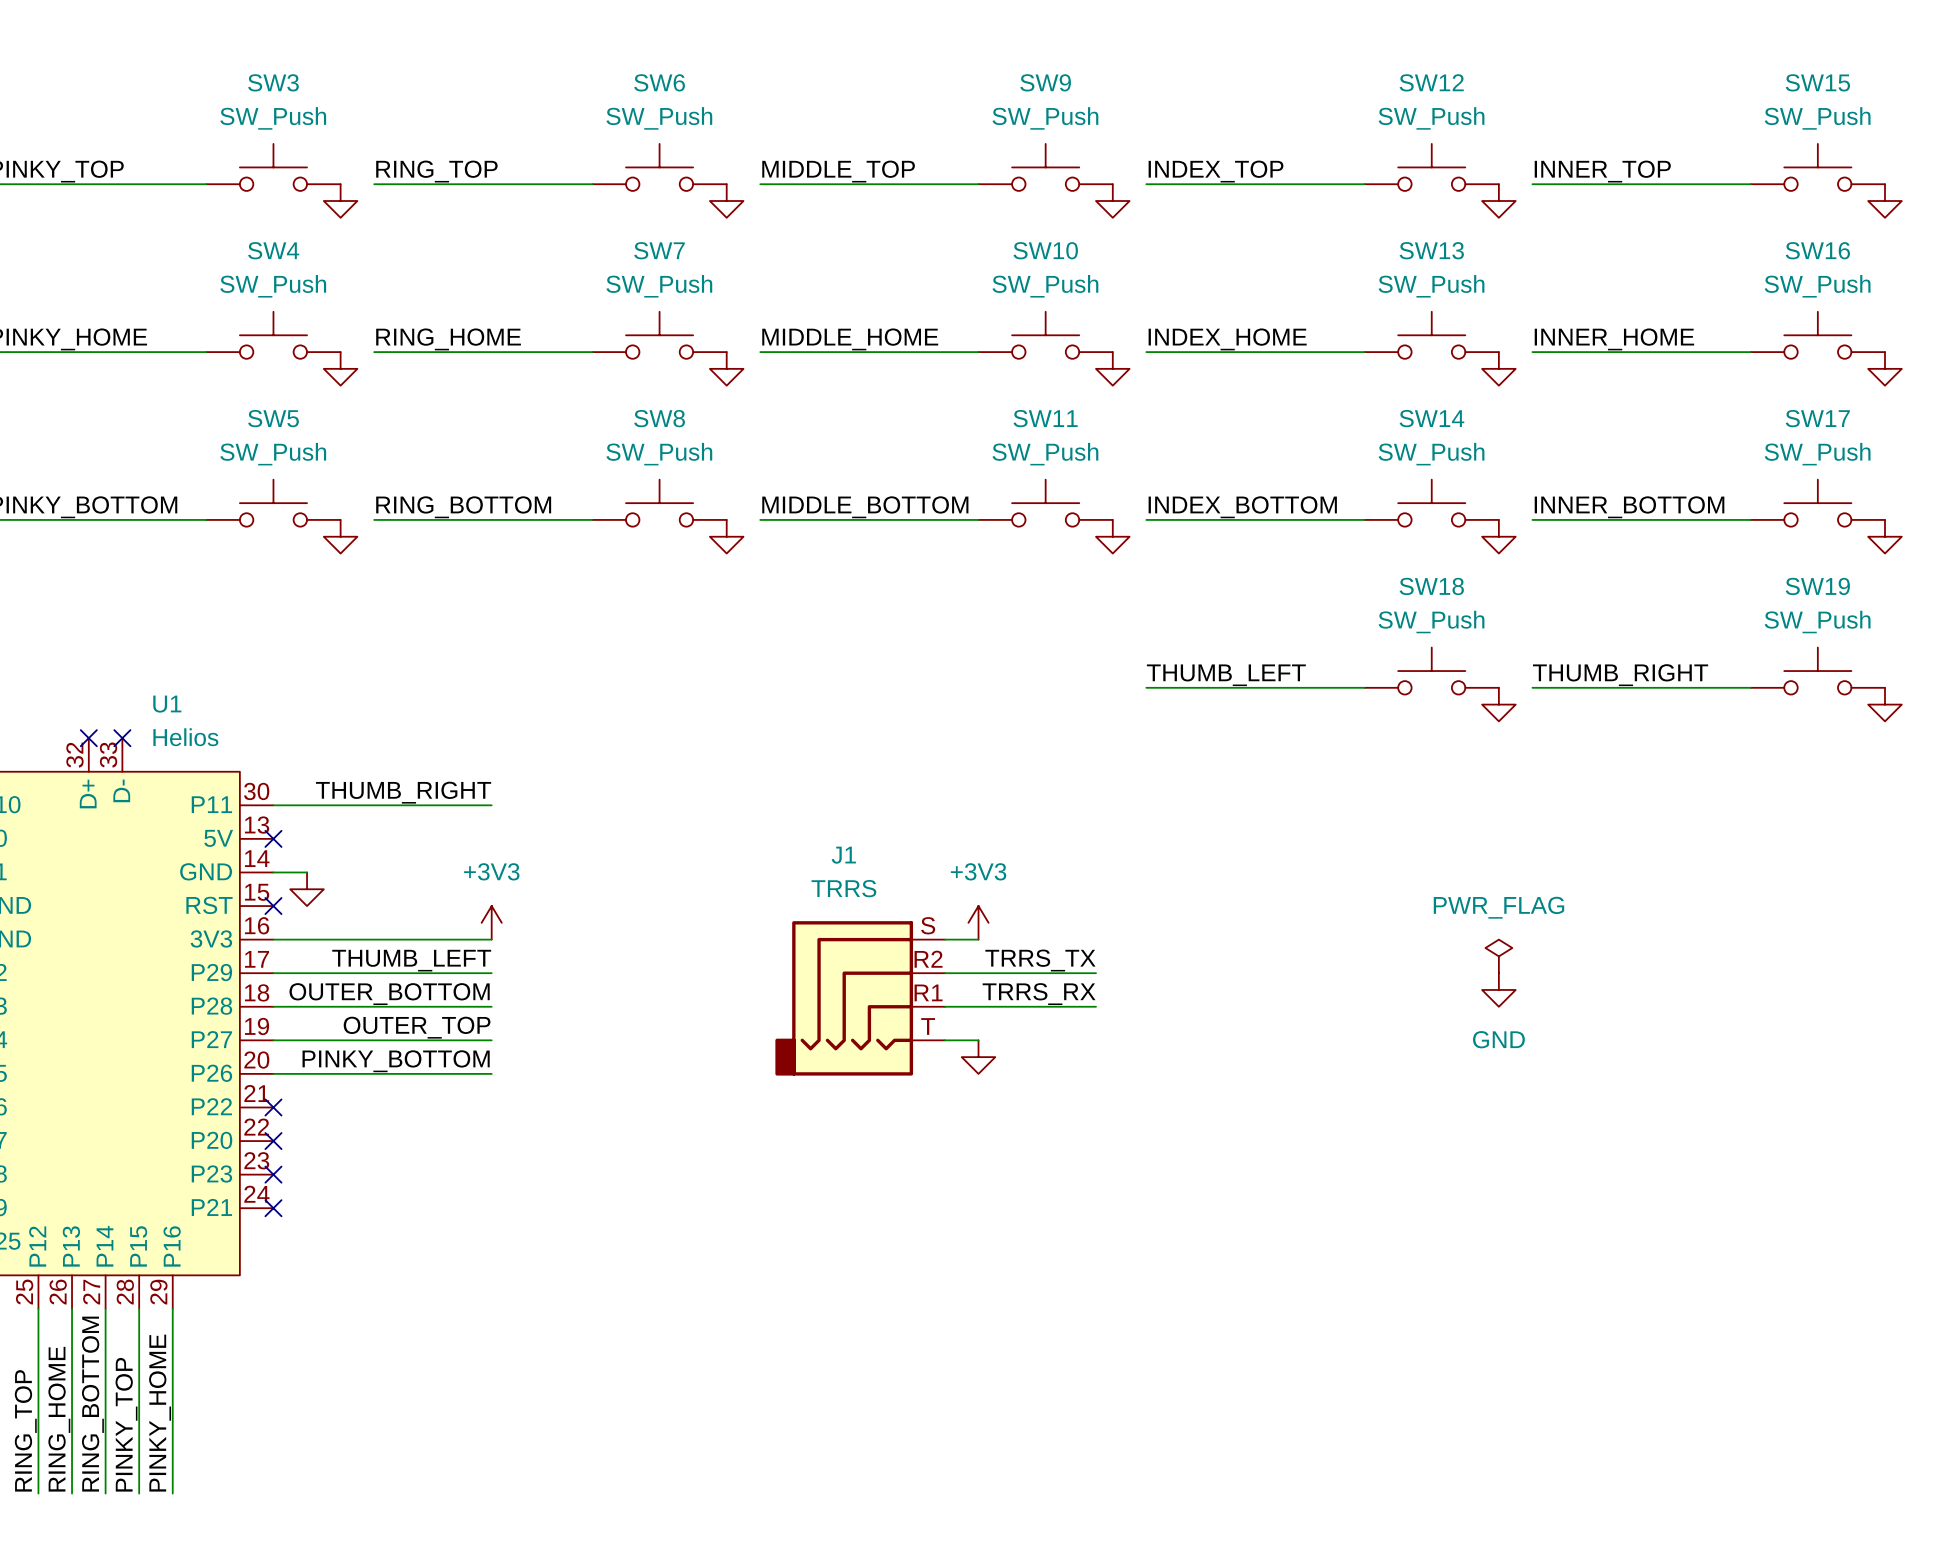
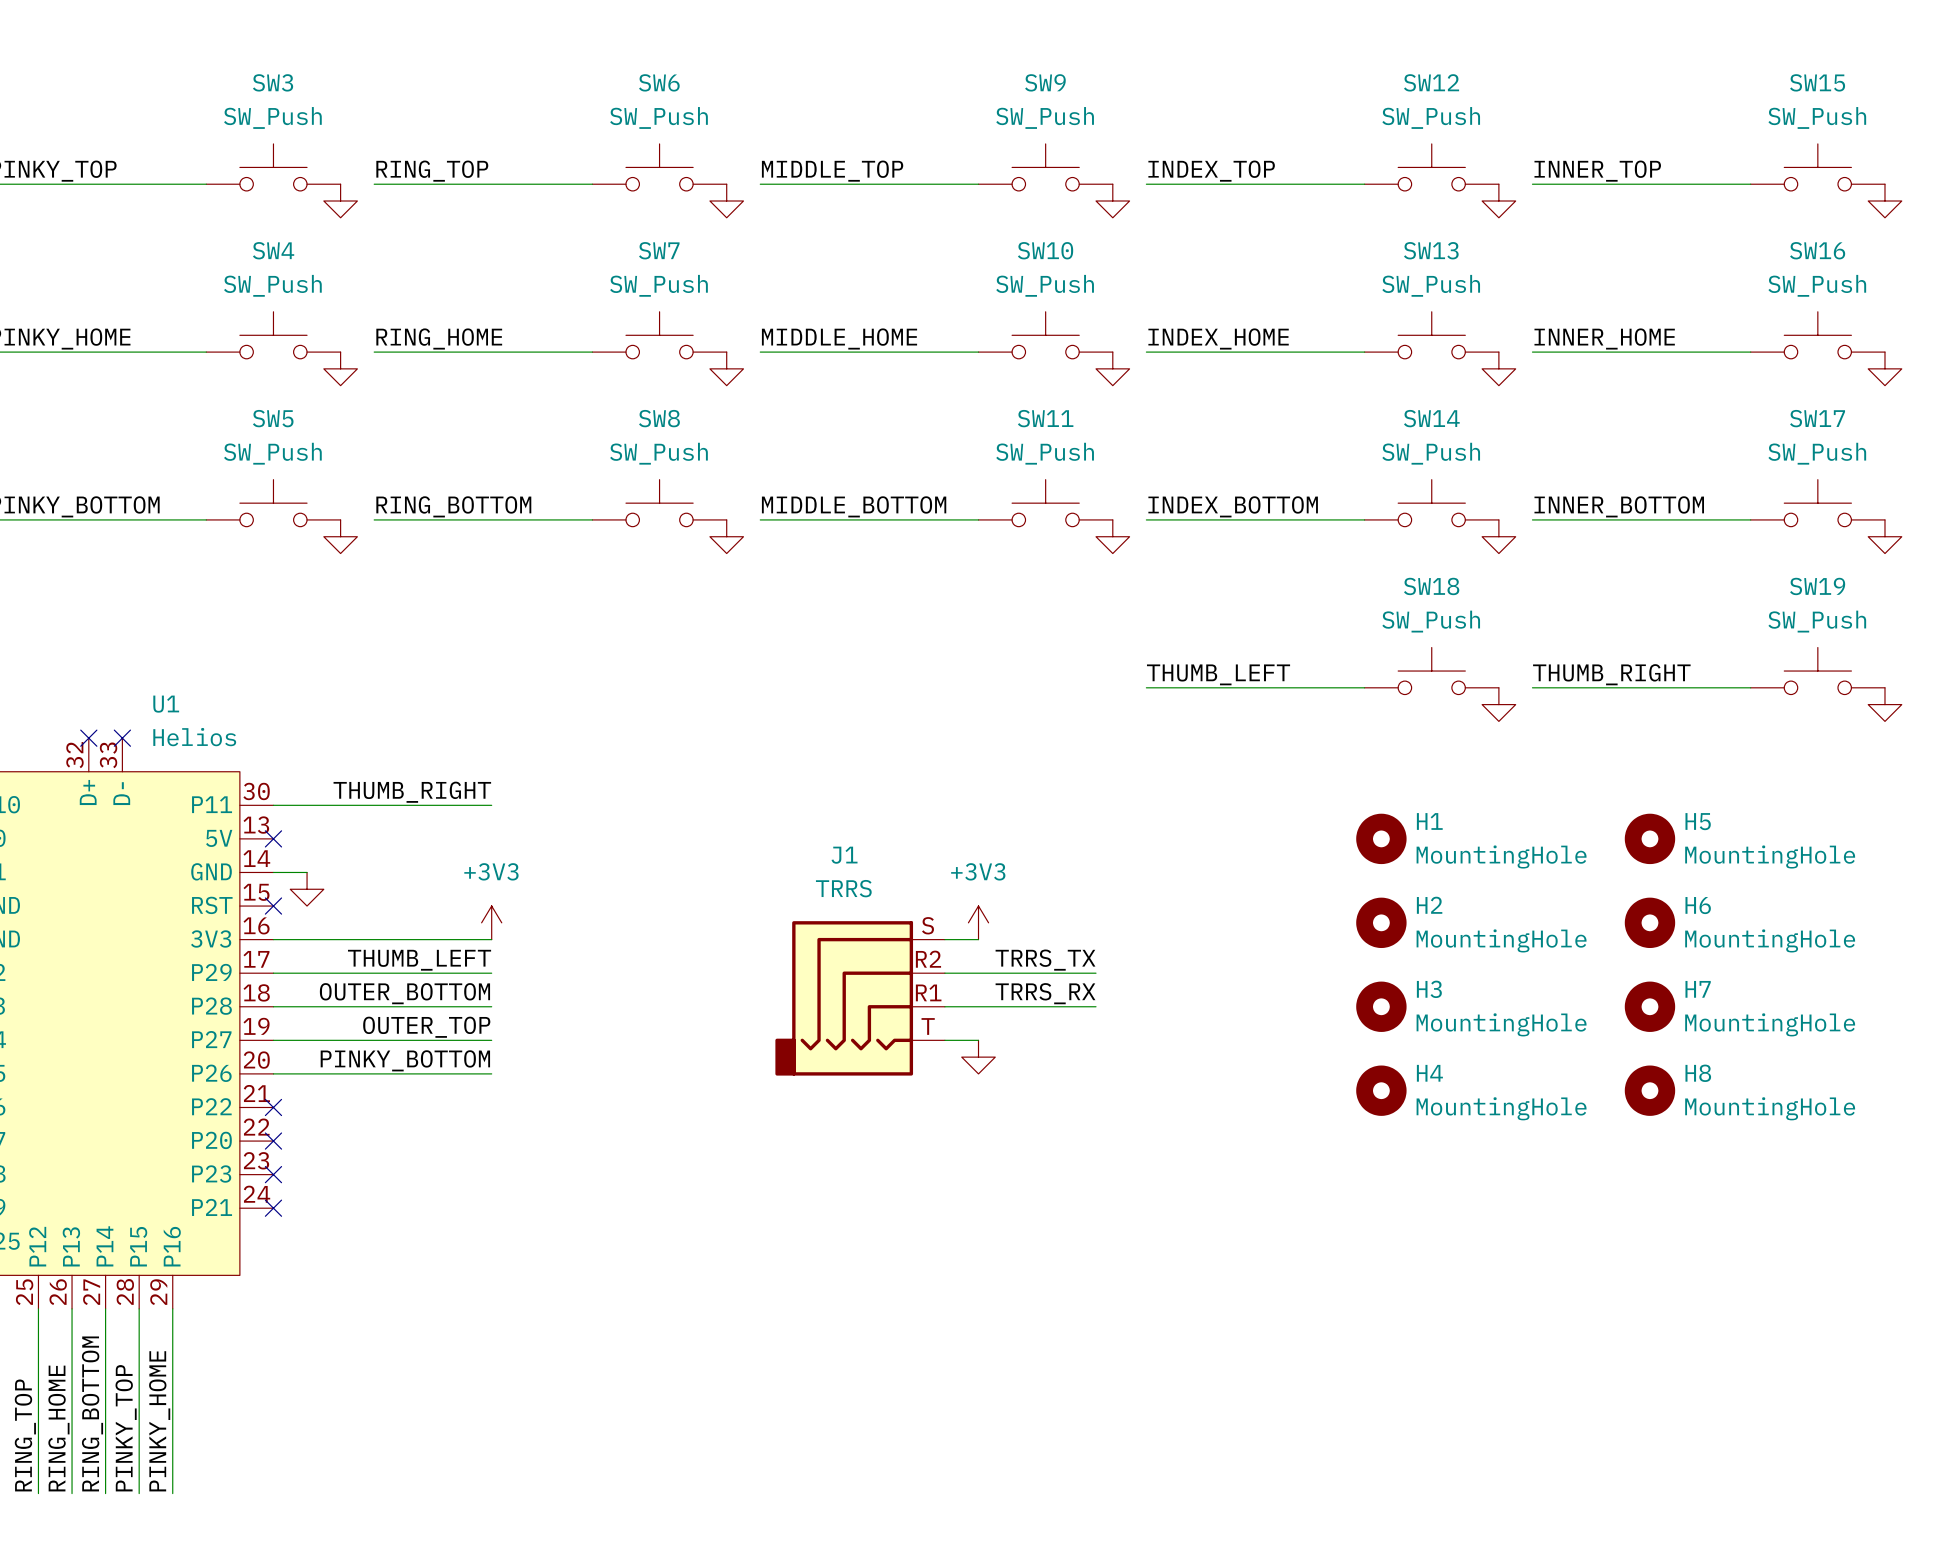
H1: none -> MountingHole (1381, 838)
H5: none -> MountingHole (1649, 838)
H2: none -> MountingHole (1381, 922)
H6: none -> MountingHole (1649, 922)
power symbol: PWR_FLAG (1498, 956) -> none
power symbol: GND (1498, 989) -> none
H3: none -> MountingHole (1381, 1006)
H7: none -> MountingHole (1649, 1006)
H4: none -> MountingHole (1381, 1090)
H8: none -> MountingHole (1649, 1090)

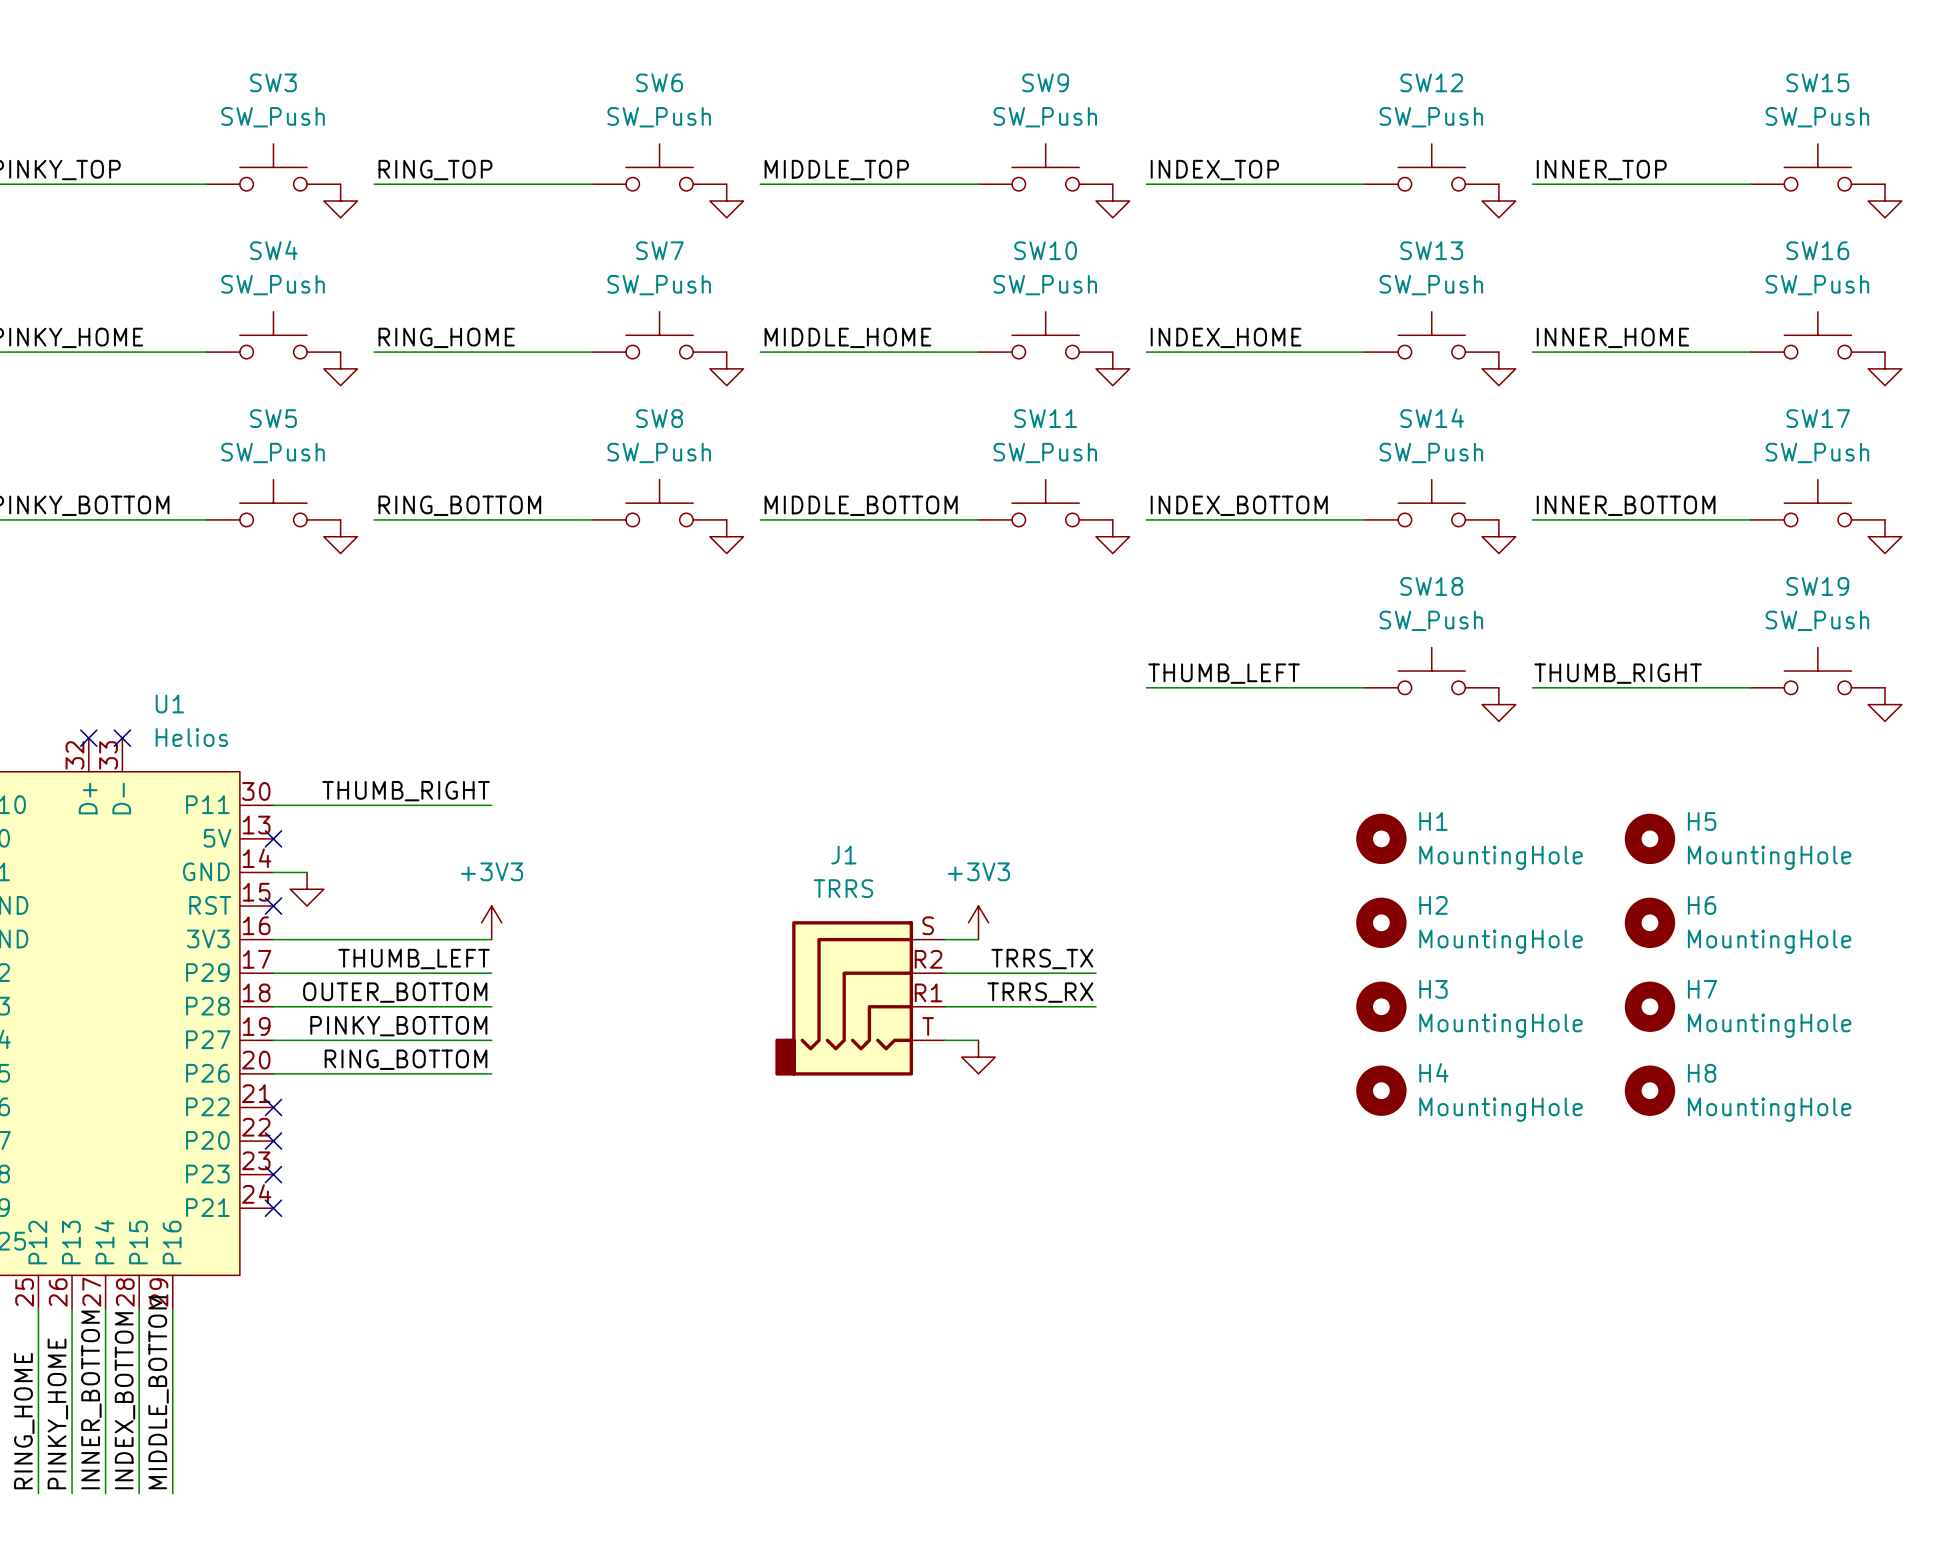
label: OUTER_TOP (426, 1027) -> PINKY_BOTTOM (398, 1026)
label: PINKY_BOTTOM (405, 1060) -> RING_BOTTOM (406, 1059)
label: RING_BOTTOM (92, 1413) -> INNER_BOTTOM (91, 1399)
label: PINKY_HOME (159, 1421) -> MIDDLE_BOTTOM (158, 1392)
label: RING_HOME (58, 1428) -> PINKY_HOME (57, 1413)
label: PINKY_TOP (126, 1428) -> INDEX_BOTTOM (124, 1400)
label: RING_TOP (25, 1435) -> RING_HOME (24, 1421)

